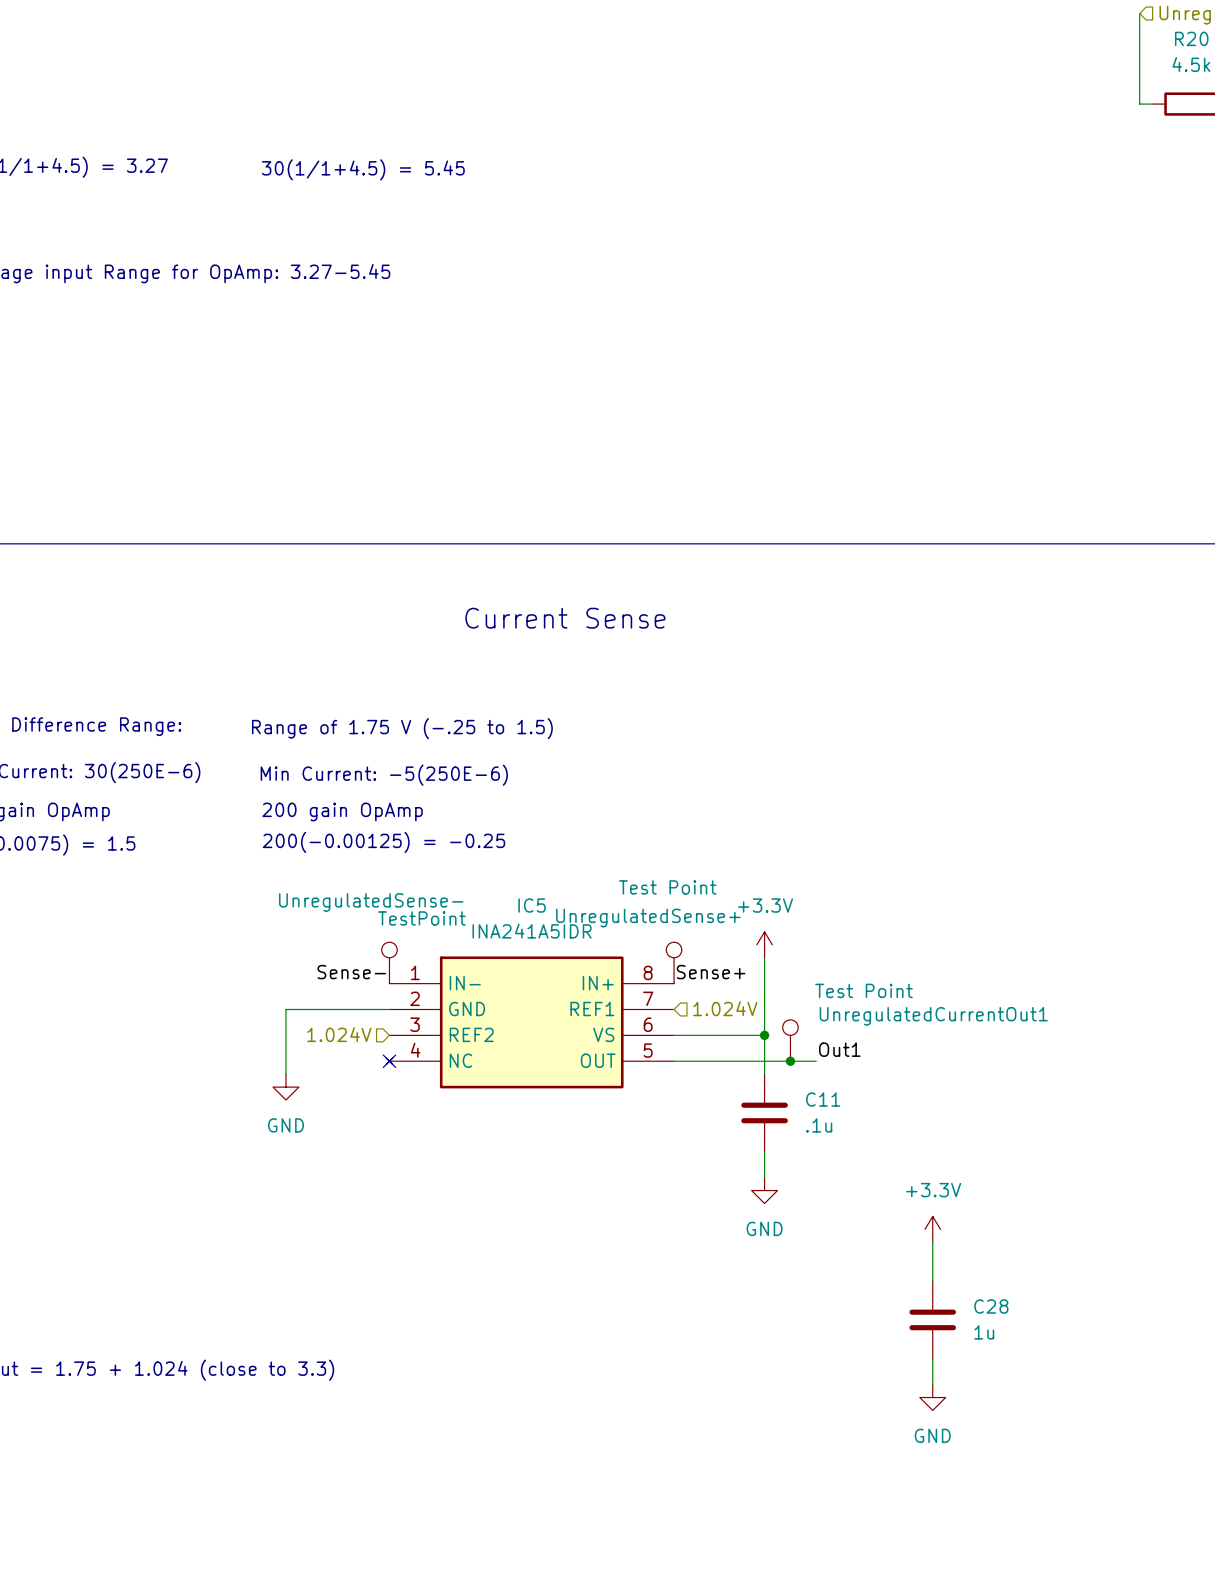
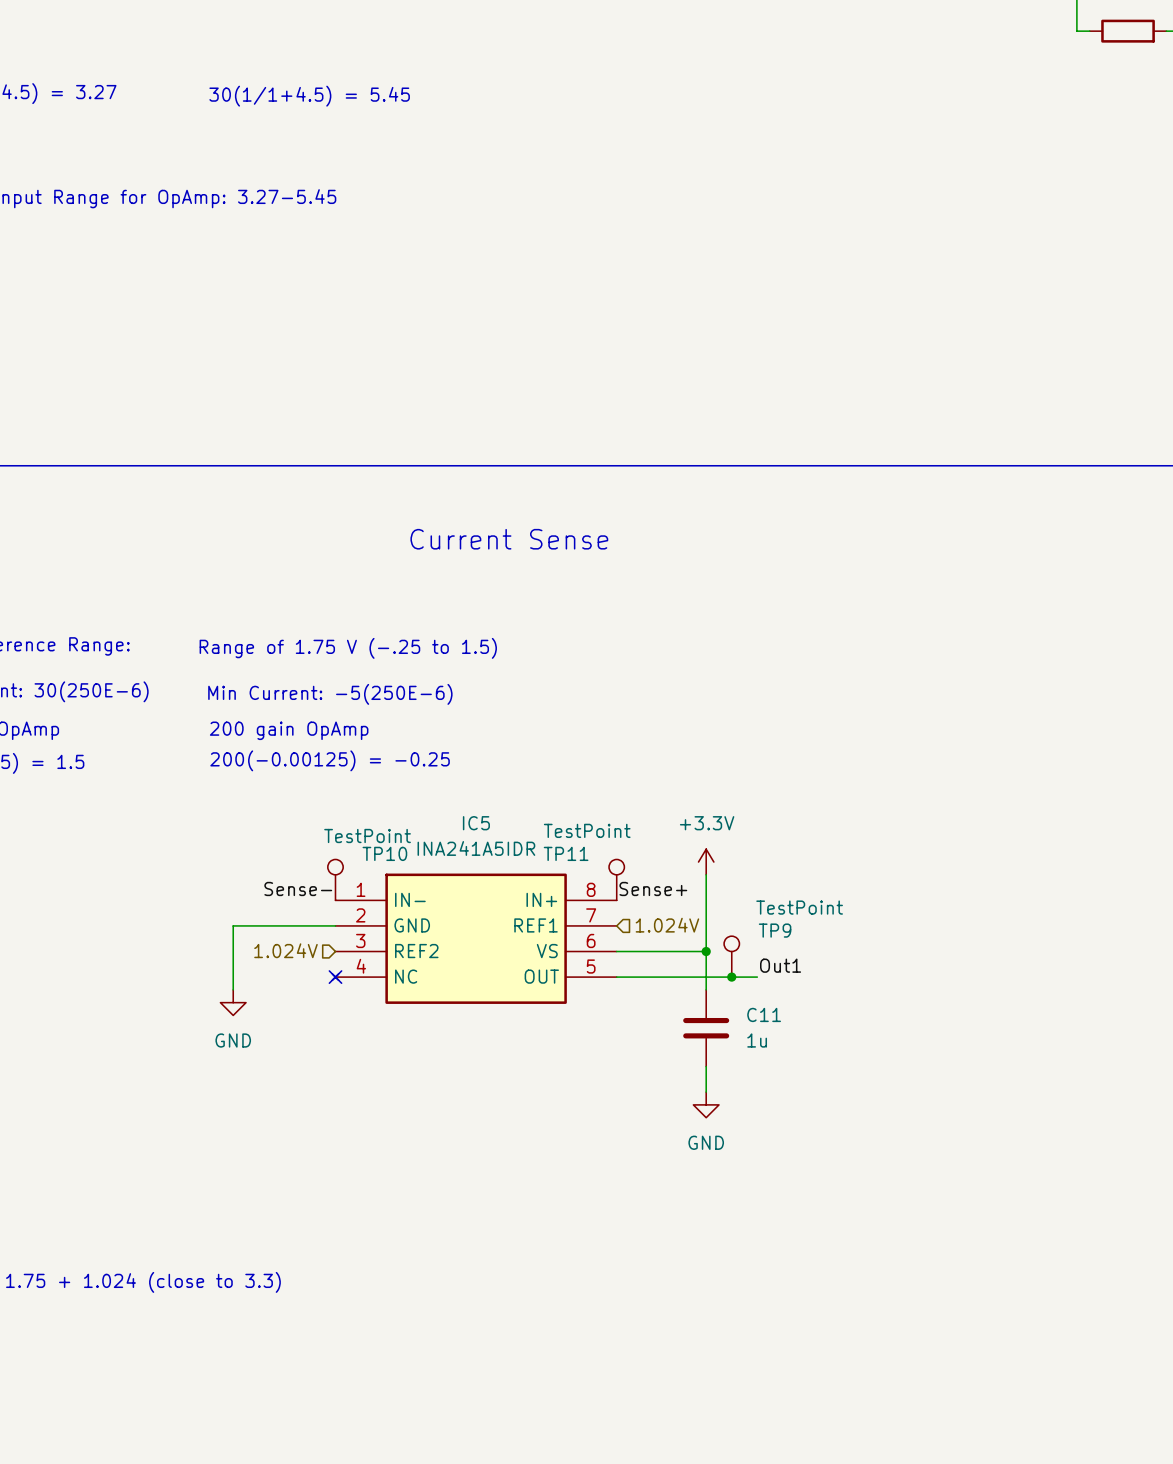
UnregulatedSense+ value: Test Point (667, 887) -> TestPoint (587, 830)
UnregulatedSense- name: UnregulatedSense- (371, 902) -> TP10 (384, 853)
UnregulatedSense+ name: UnregulatedSense+ (648, 918) -> TP11 (566, 853)
UnregulatedCurrentOut1 value: Test Point (864, 990) -> TestPoint (799, 907)
UnregulatedCurrentOut1 name: UnregulatedCurrentOut1 (933, 1016) -> TP9 (775, 930)
C11 value: .1u (819, 1125) -> 1u (757, 1040)
power symbol: +3.3V (932, 1229) -> none
wire: (932, 1242) (932, 1281) -> none
C28: 1u (932, 1319) -> none
wire: (932, 1358) (932, 1384) -> none
power symbol: GND (932, 1397) -> none

